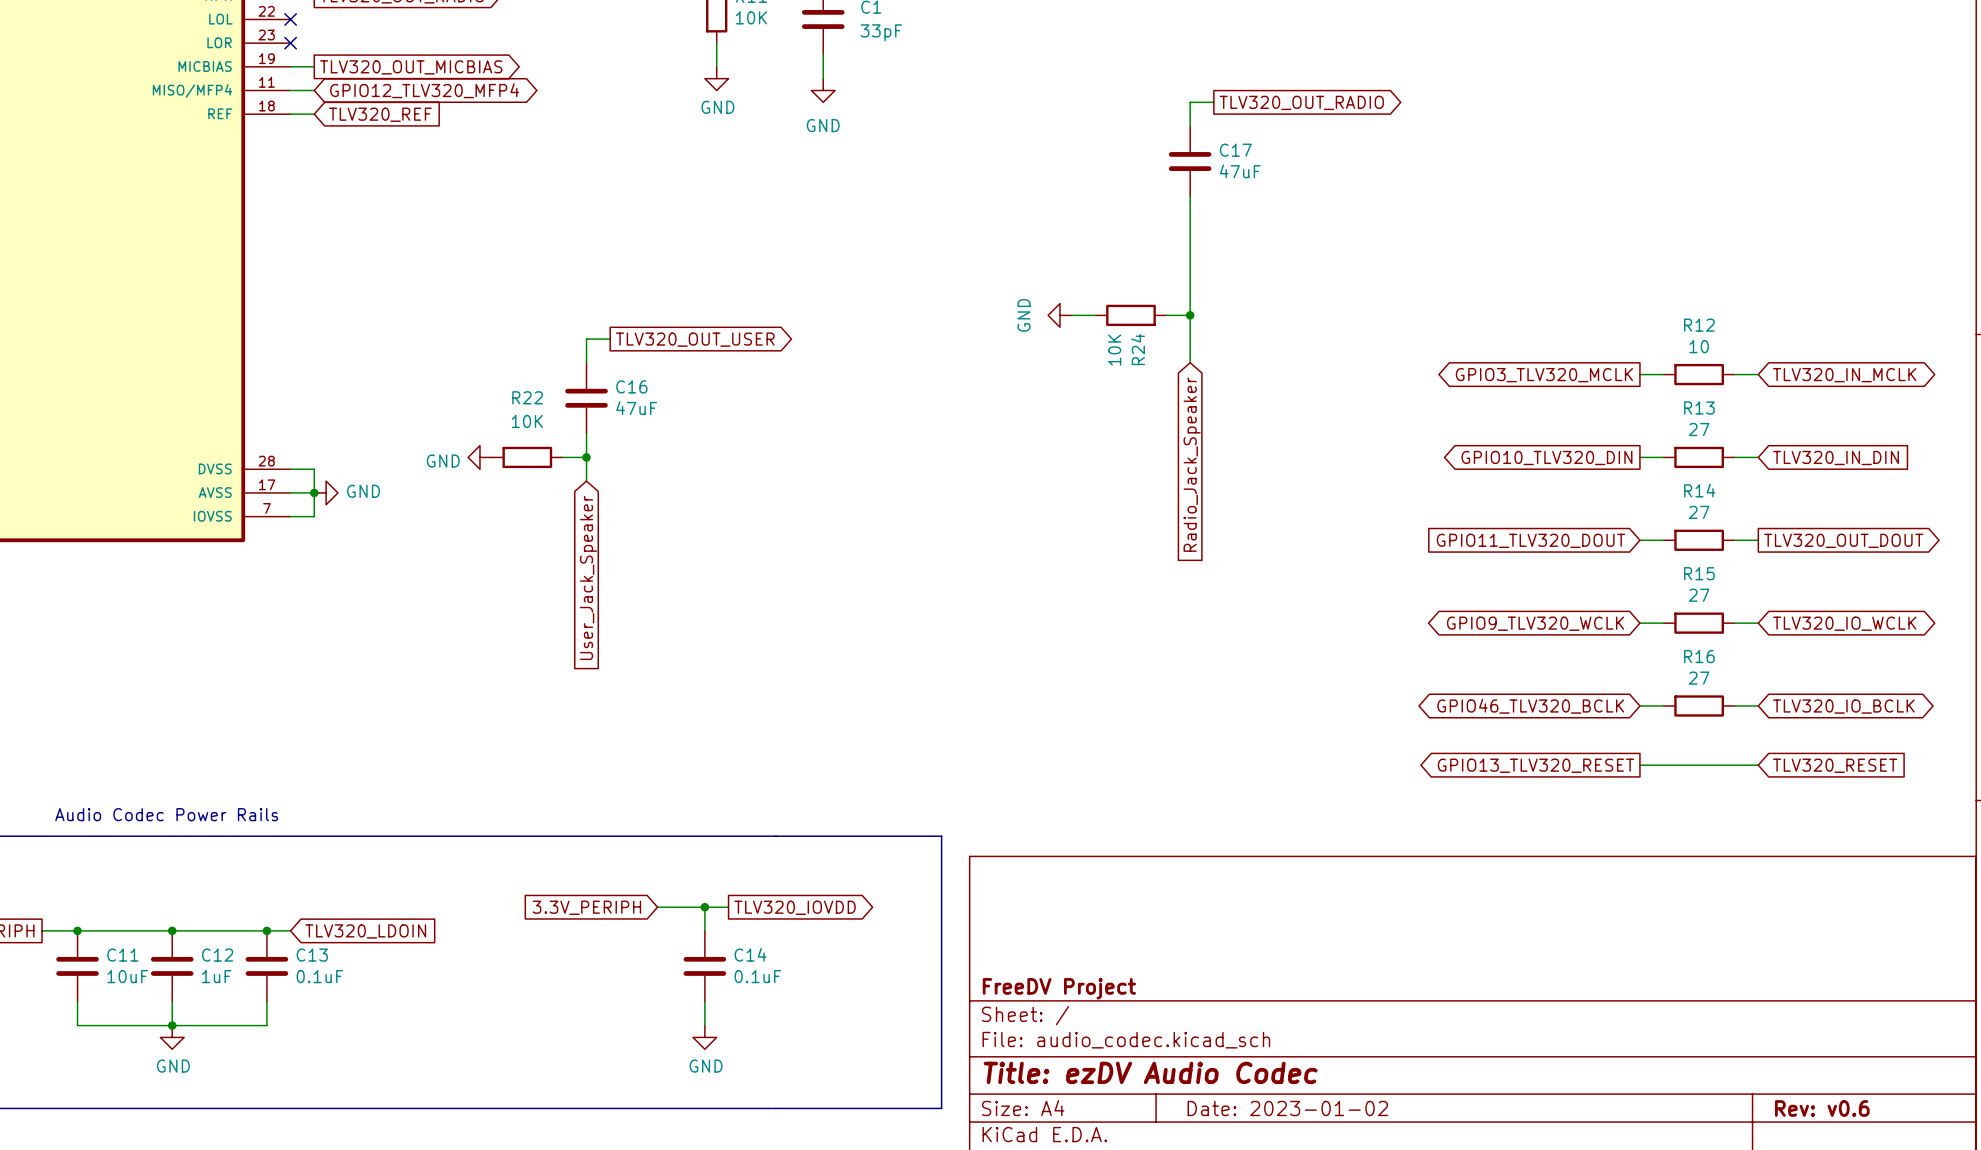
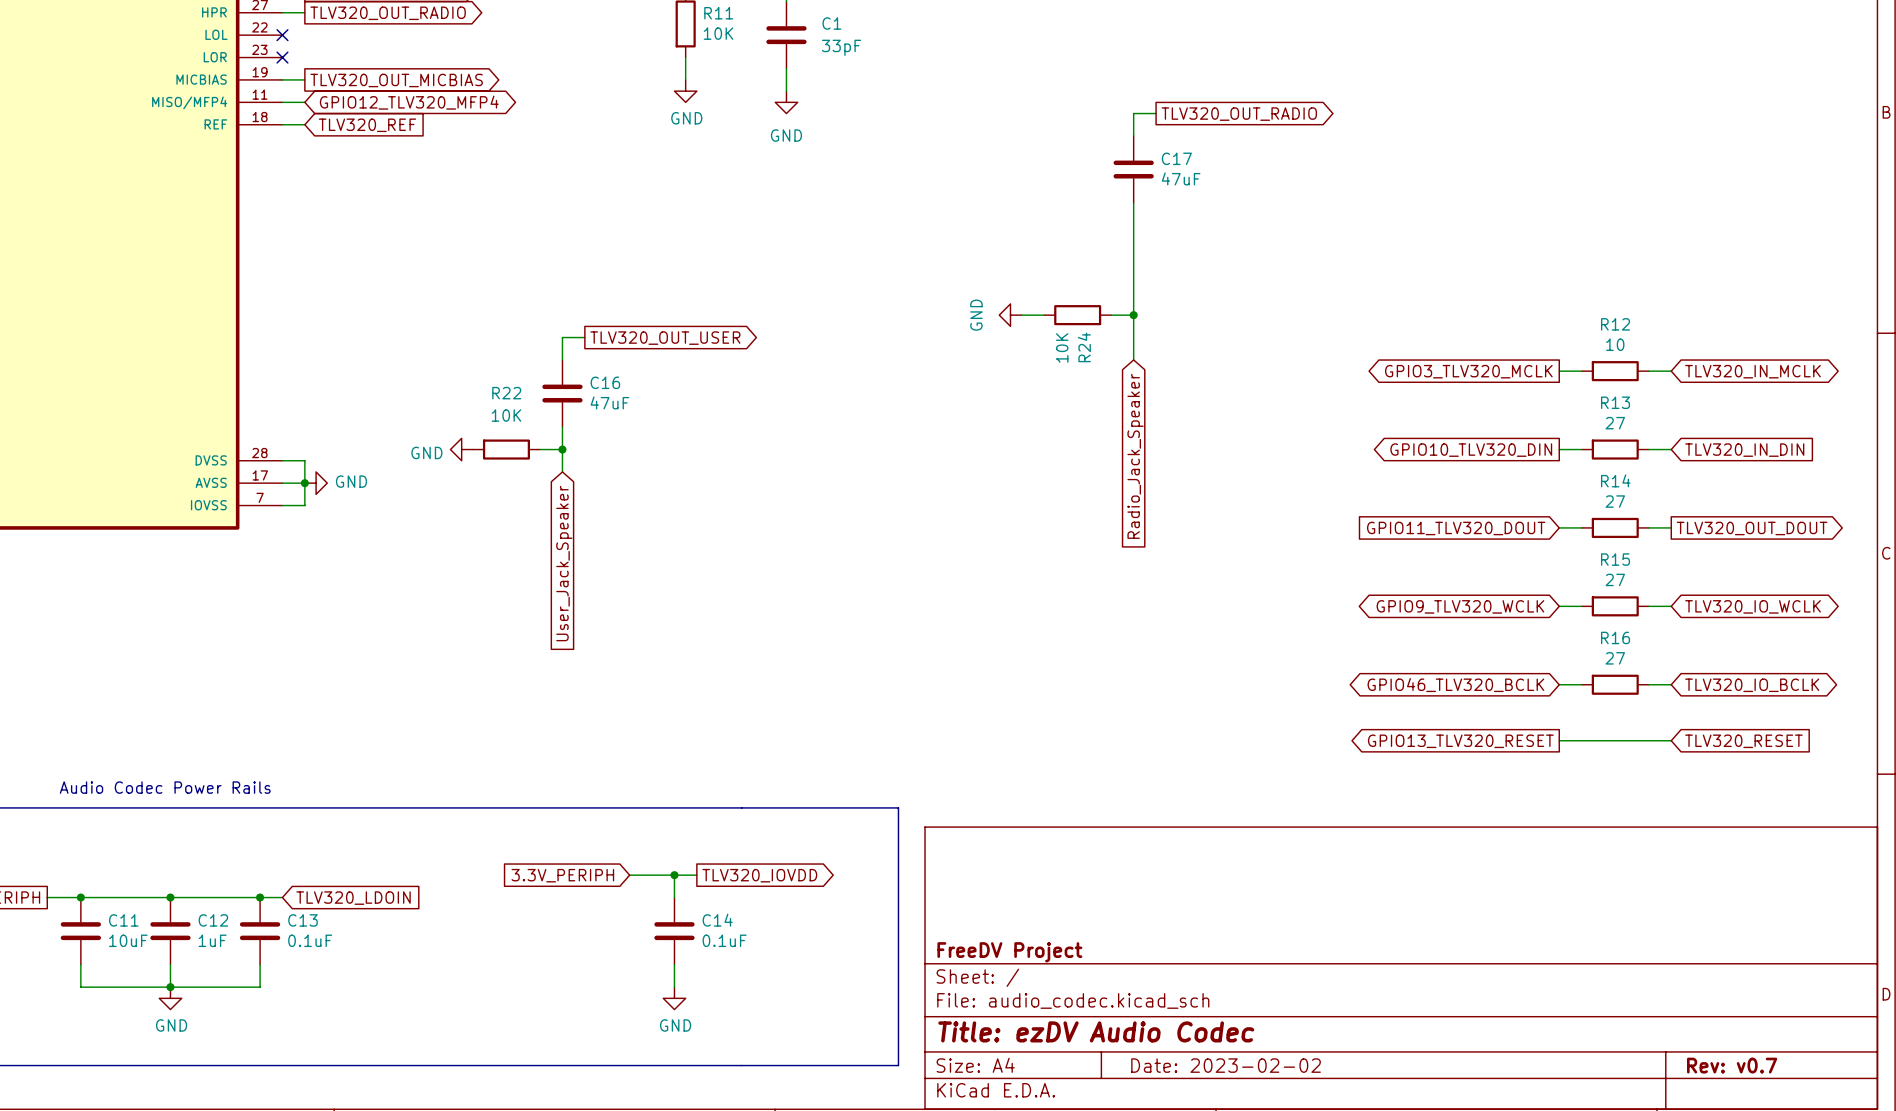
title block: Date: 2023-01-02 (1287, 1108) -> Date: 2023-02-02 (1226, 1065)
title block: Rev: v0.6 (1822, 1108) -> Rev: v0.7 (1732, 1065)

